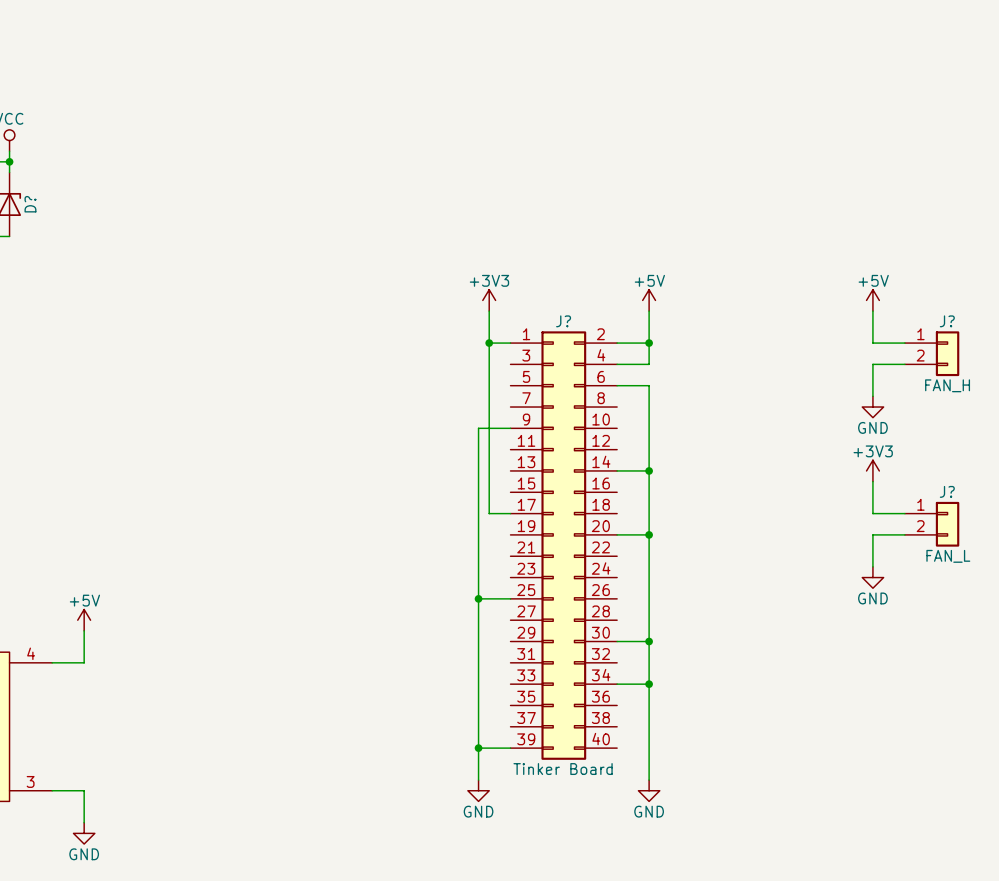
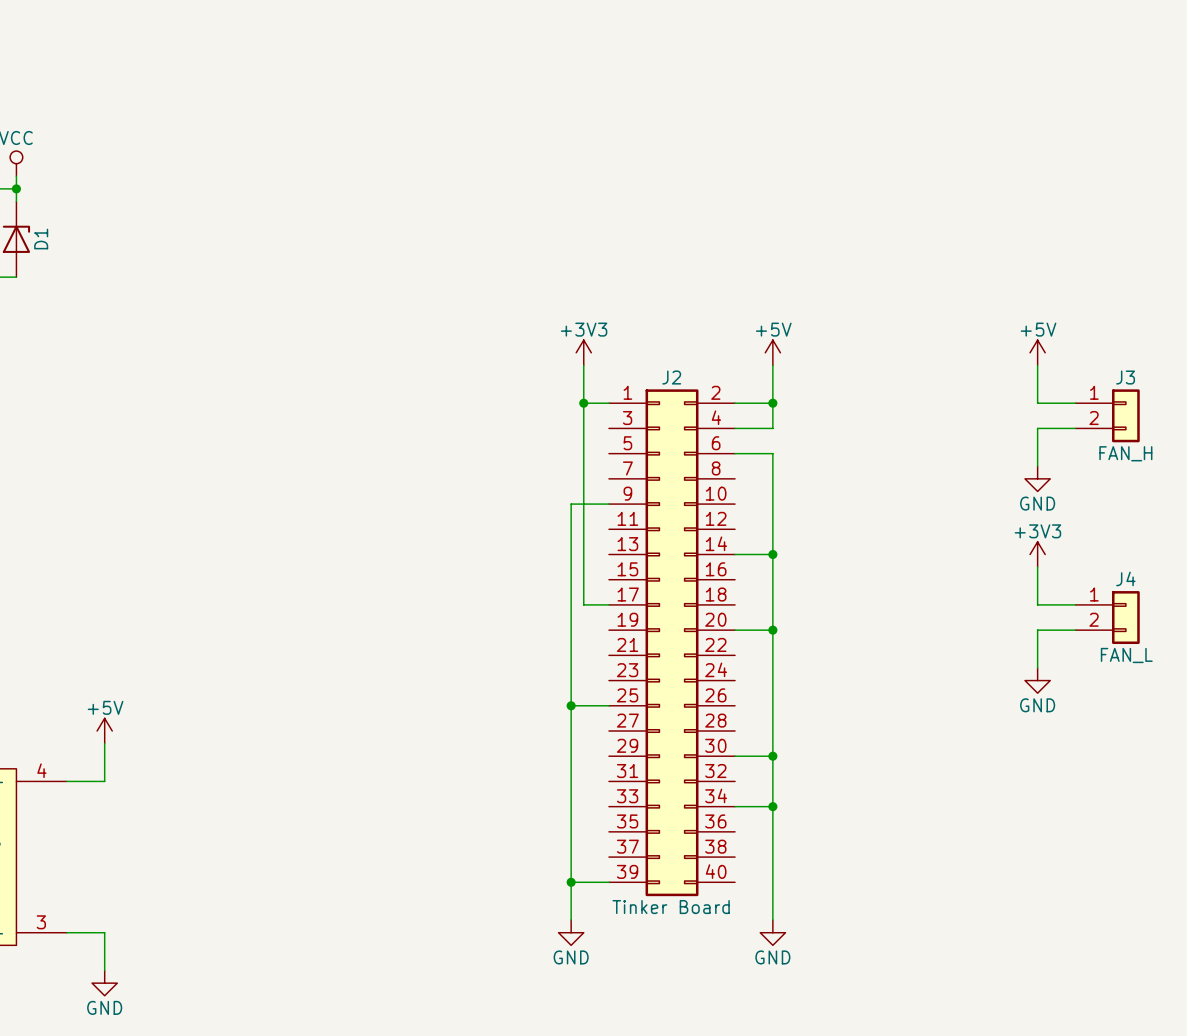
D? name: D? (30, 204) -> D1 (41, 239)
J? name: J? (563, 321) -> J2 (671, 377)
J? name: J? (947, 321) -> J3 (1125, 377)
J? name: J? (947, 491) -> J4 (1125, 578)

